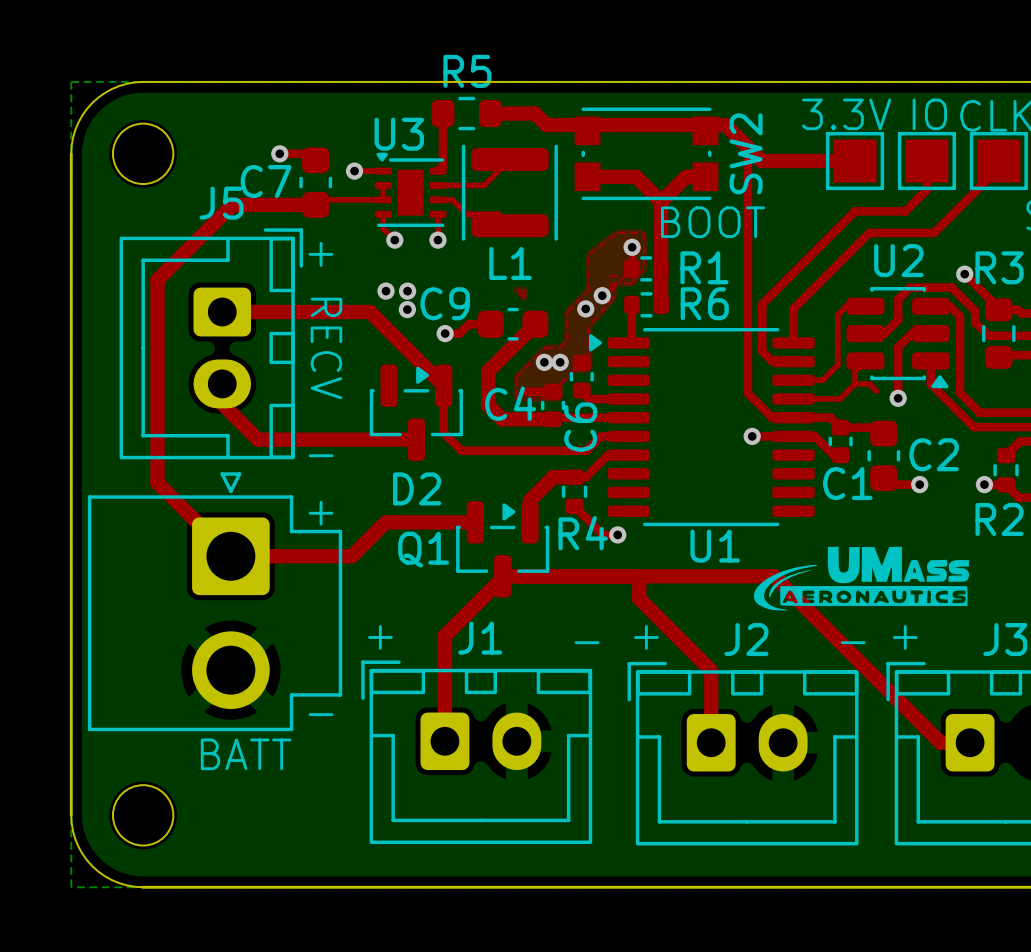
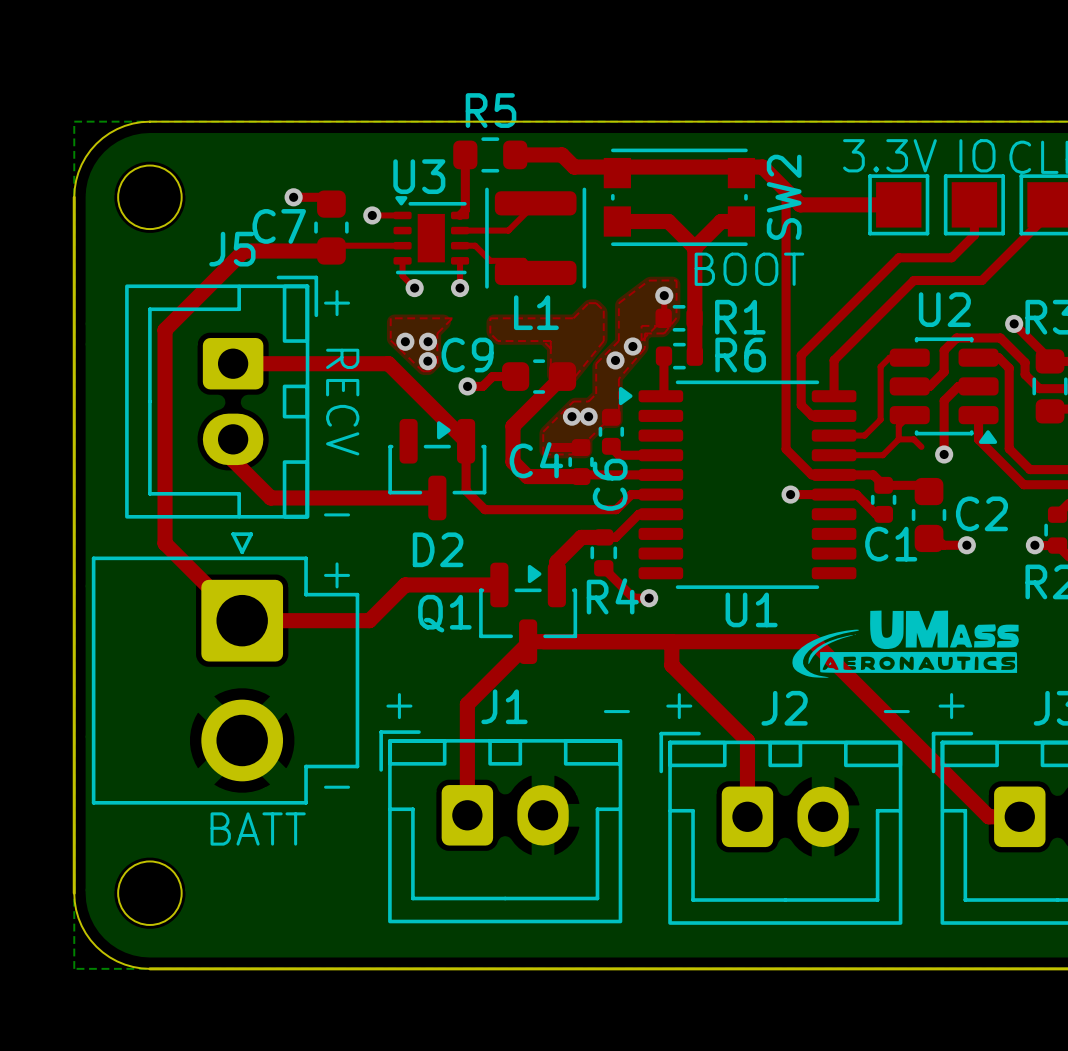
top track: (383, 185) (383, 199) -> none
top zone outline: none -> (390, 318) (390, 340) (422, 371) (429, 371) (437, 363) (437, 333) (452, 318) (390, 318)
top zone outline: none -> (543, 341) (497, 341) (490, 333) (490, 318) (573, 318) (588, 303) (596, 303) (603, 310) (603, 341) (573, 378) (550, 378) (550, 348)

